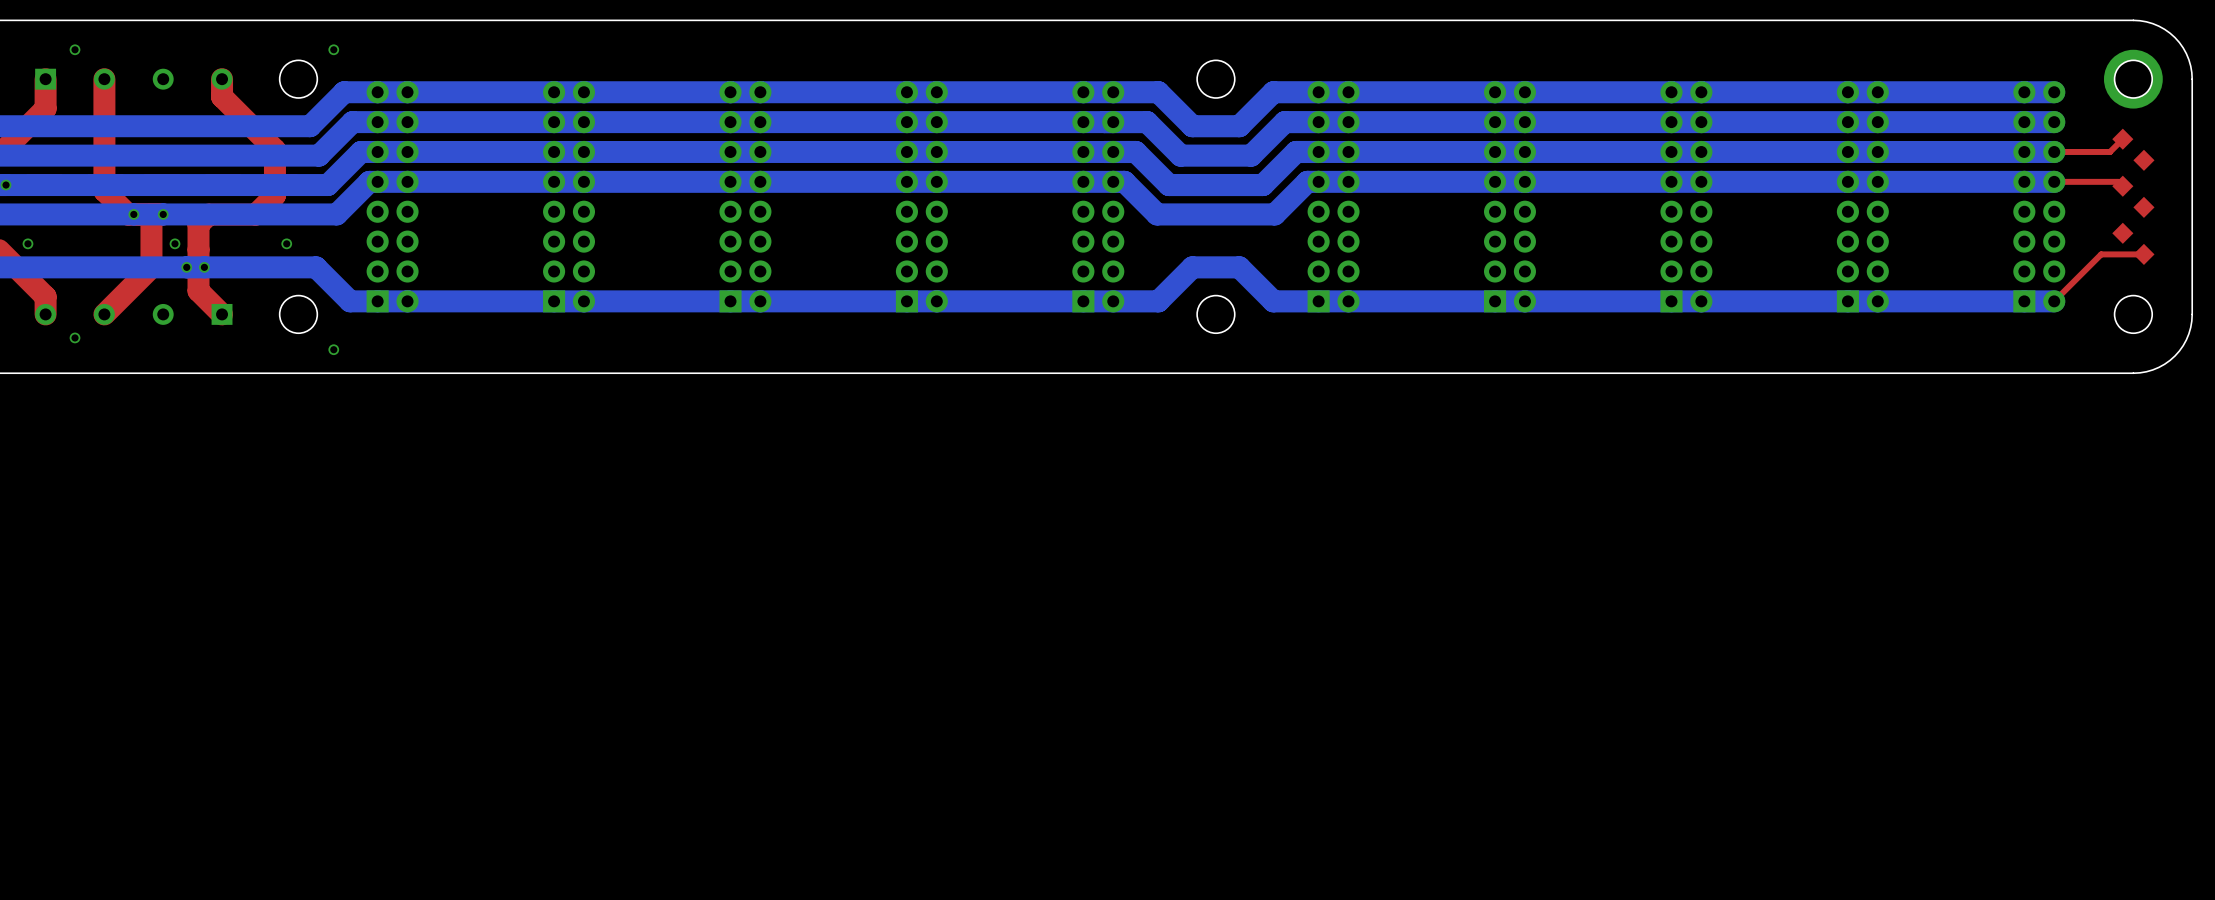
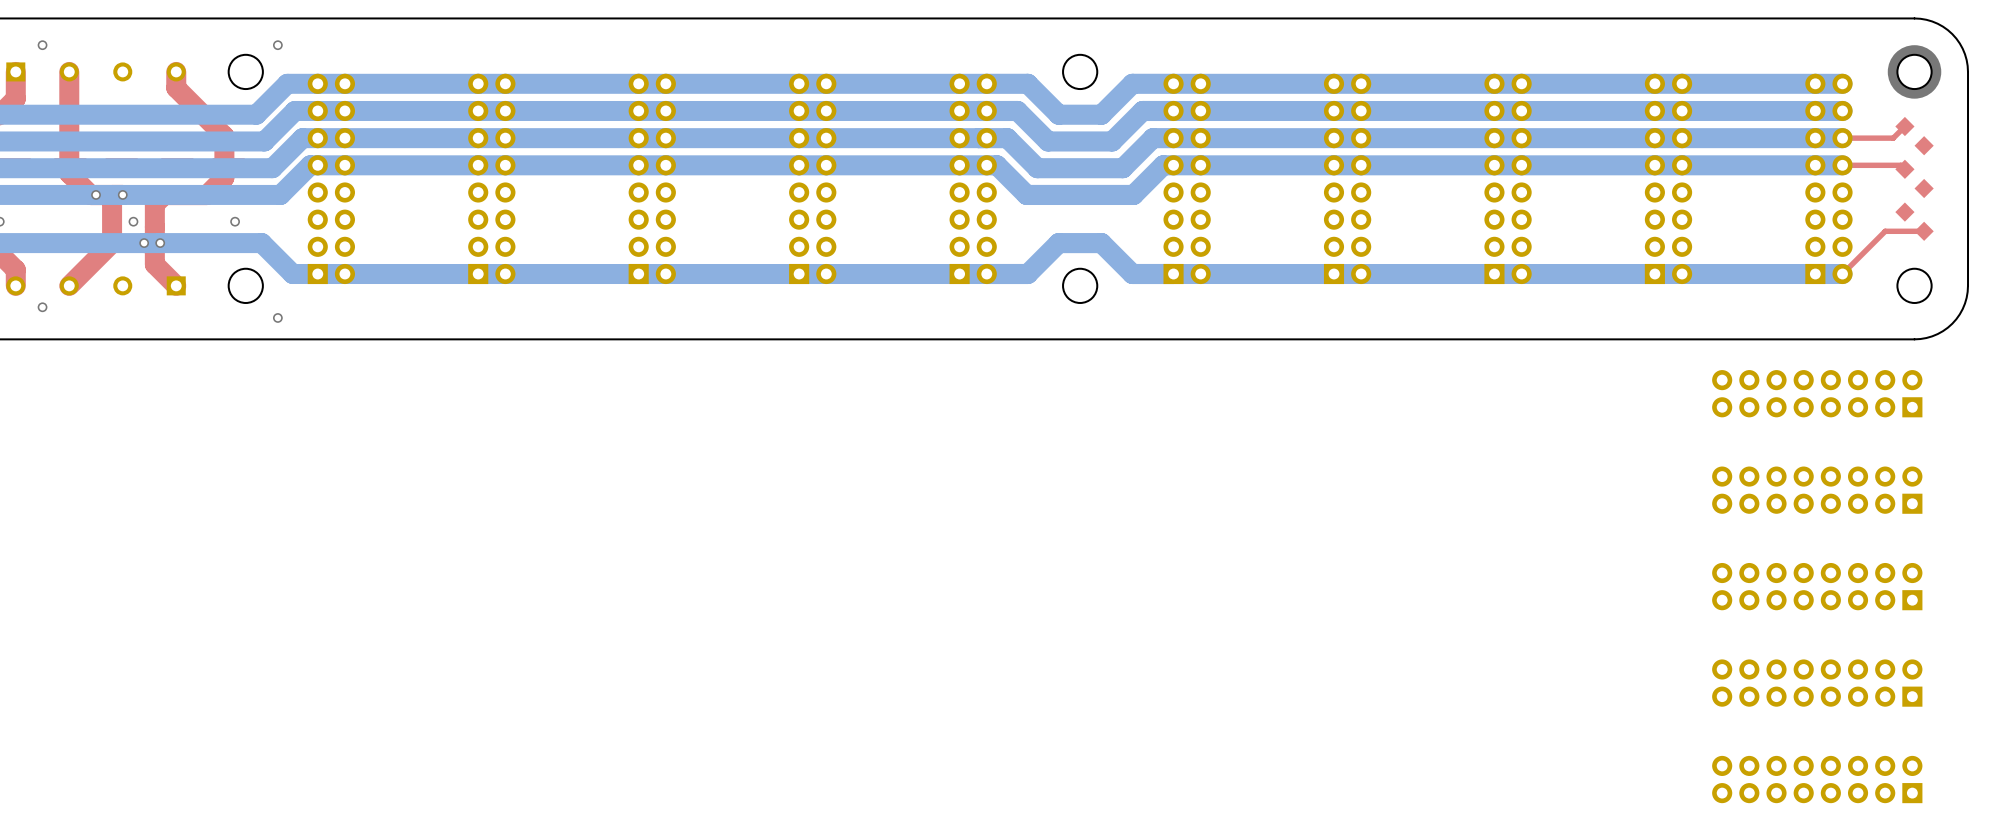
part: none -> (1817, 393)
part: none -> (1817, 490)
part: none -> (1817, 586)
part: none -> (1817, 683)
part: none -> (1817, 779)

